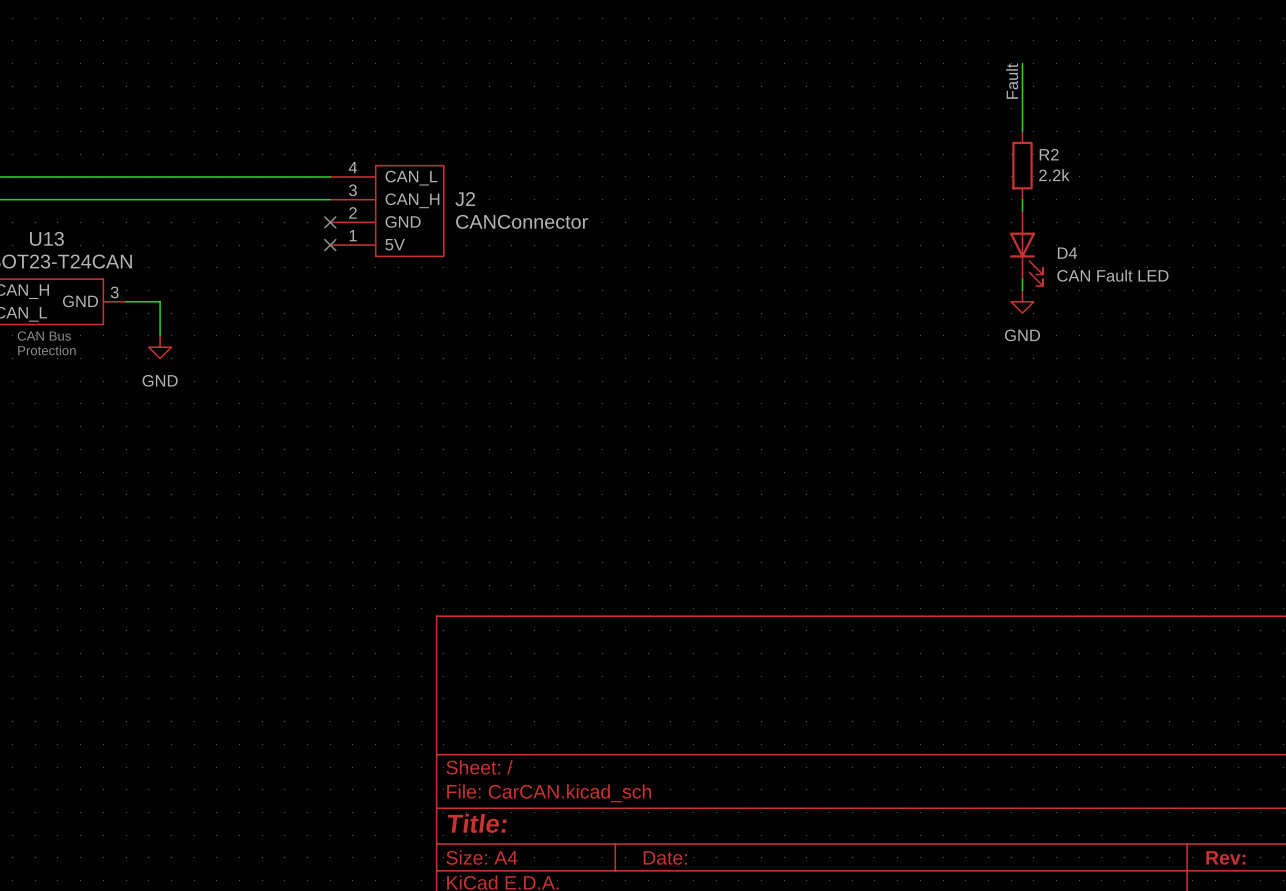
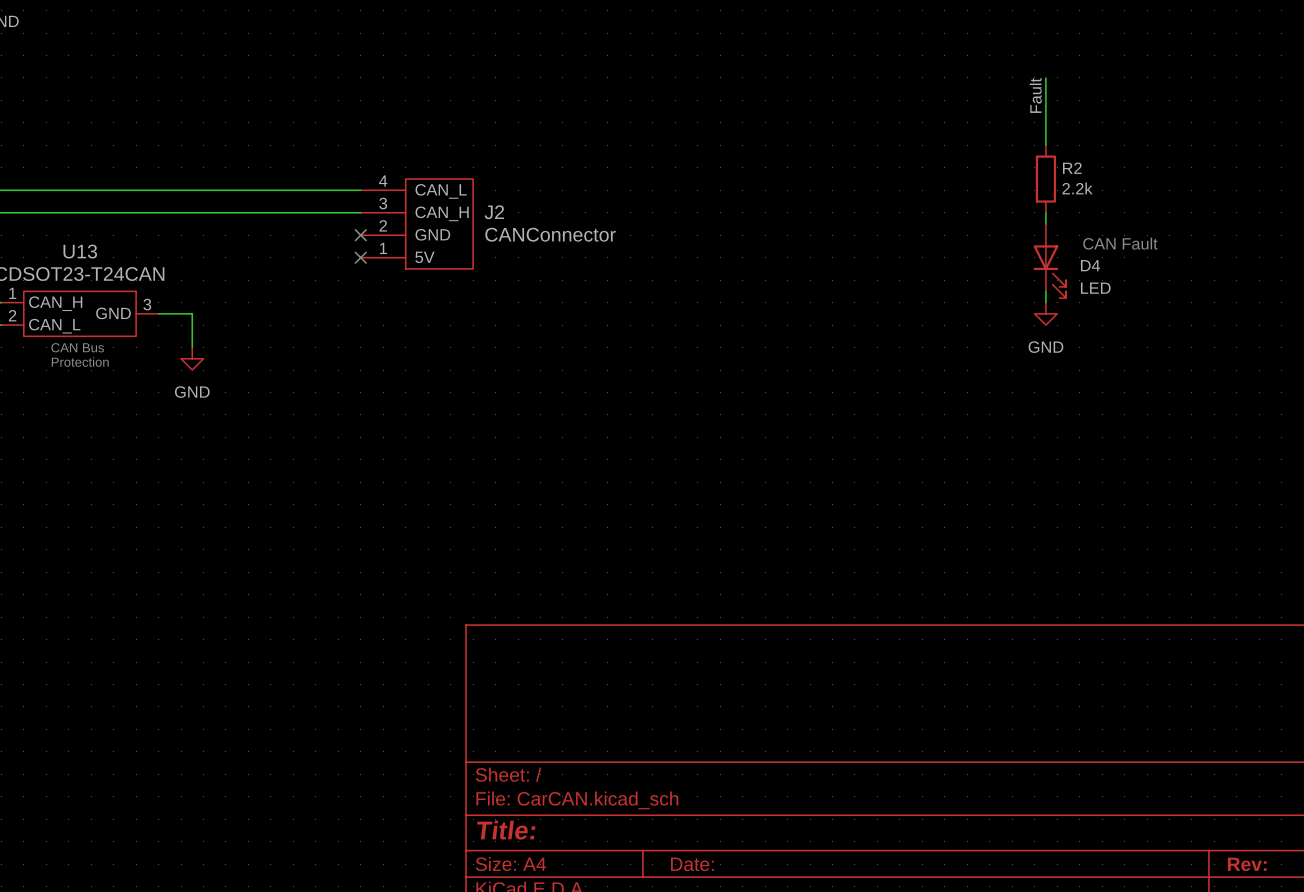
text: none -> CAN Fault (1120, 243)
D4 value: CAN Fault LED (1112, 275) -> LED (1095, 288)

